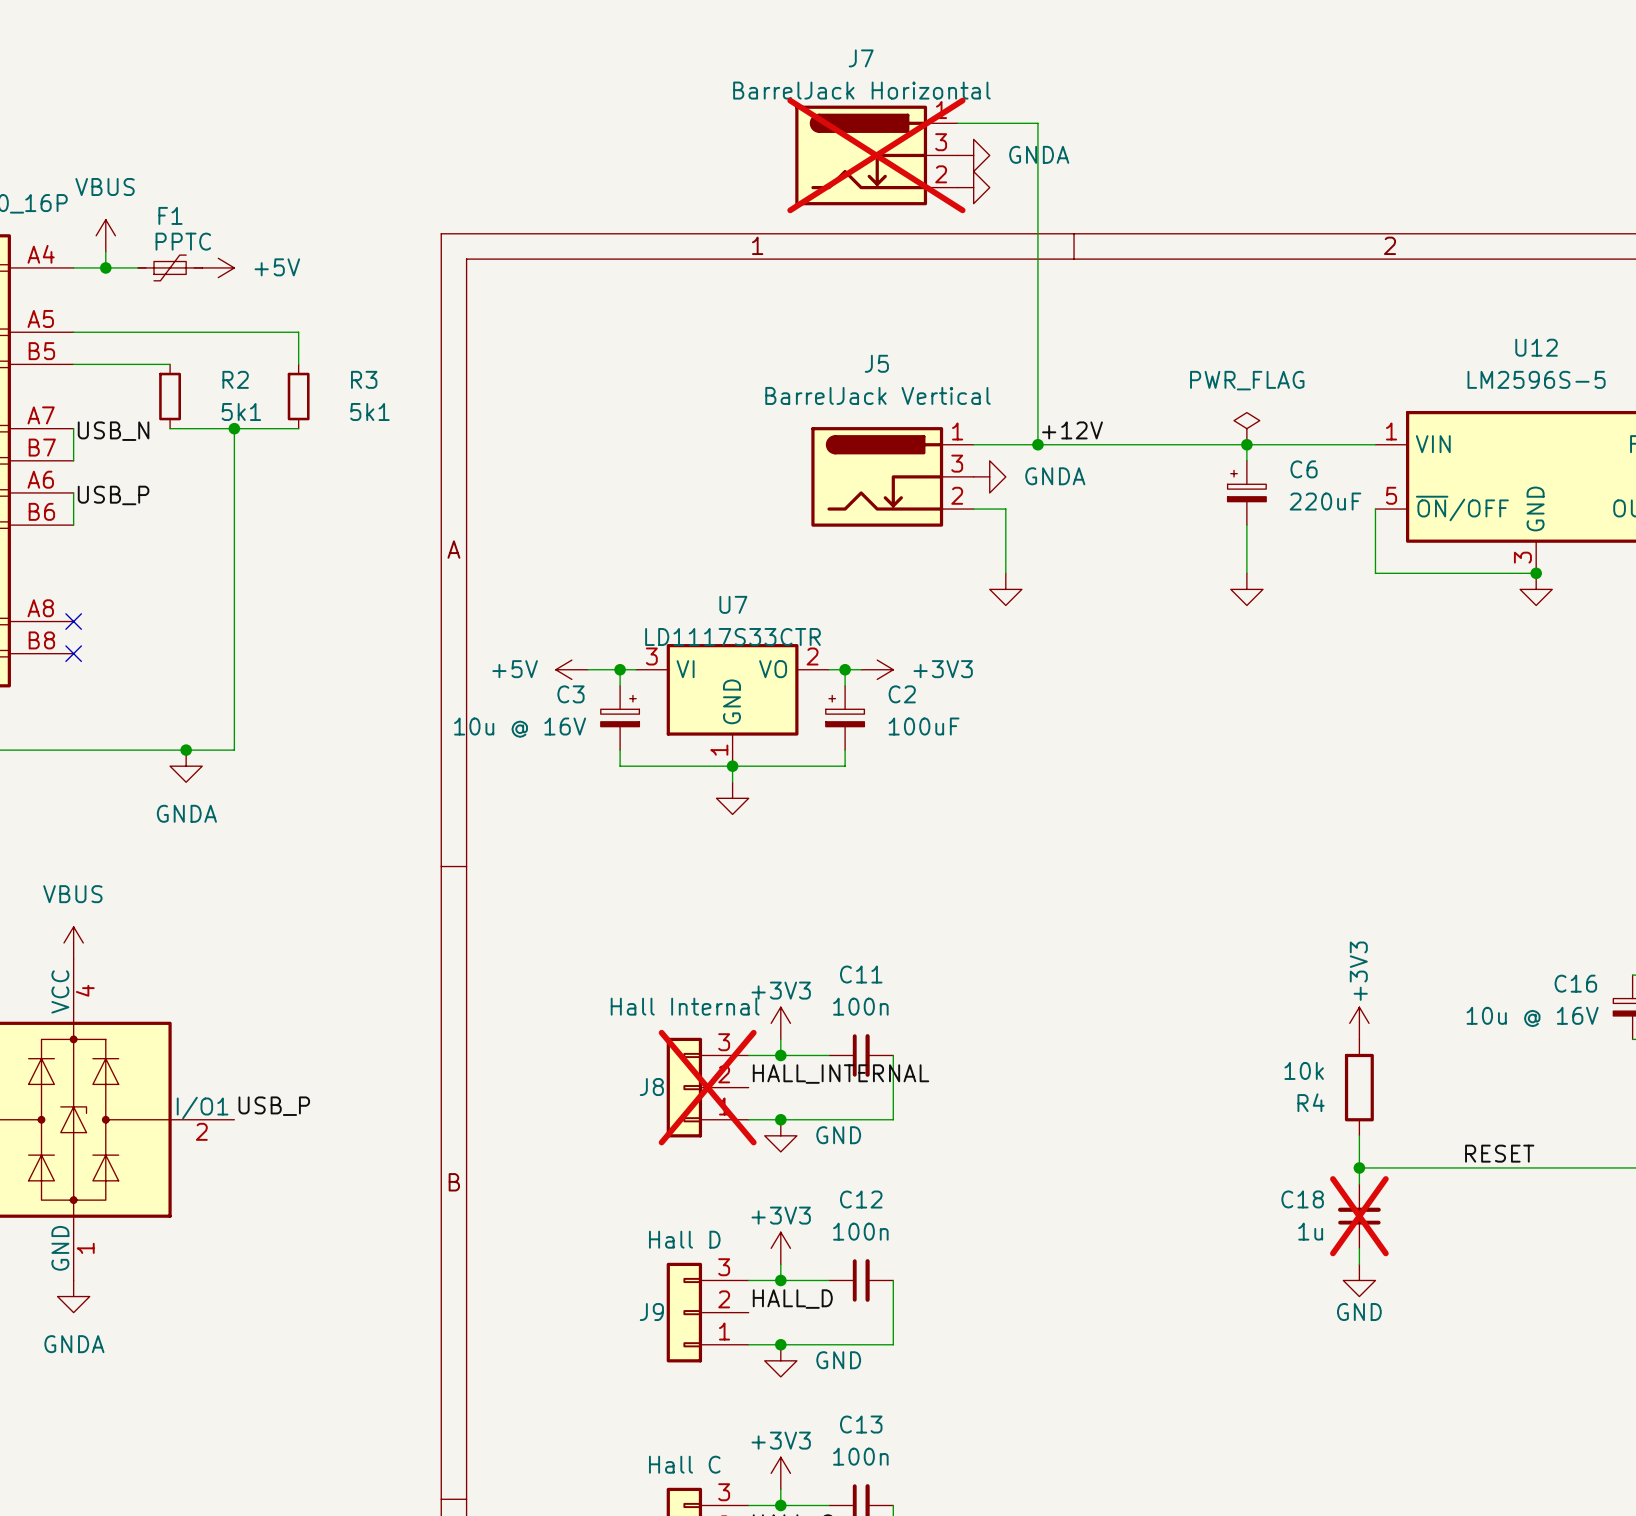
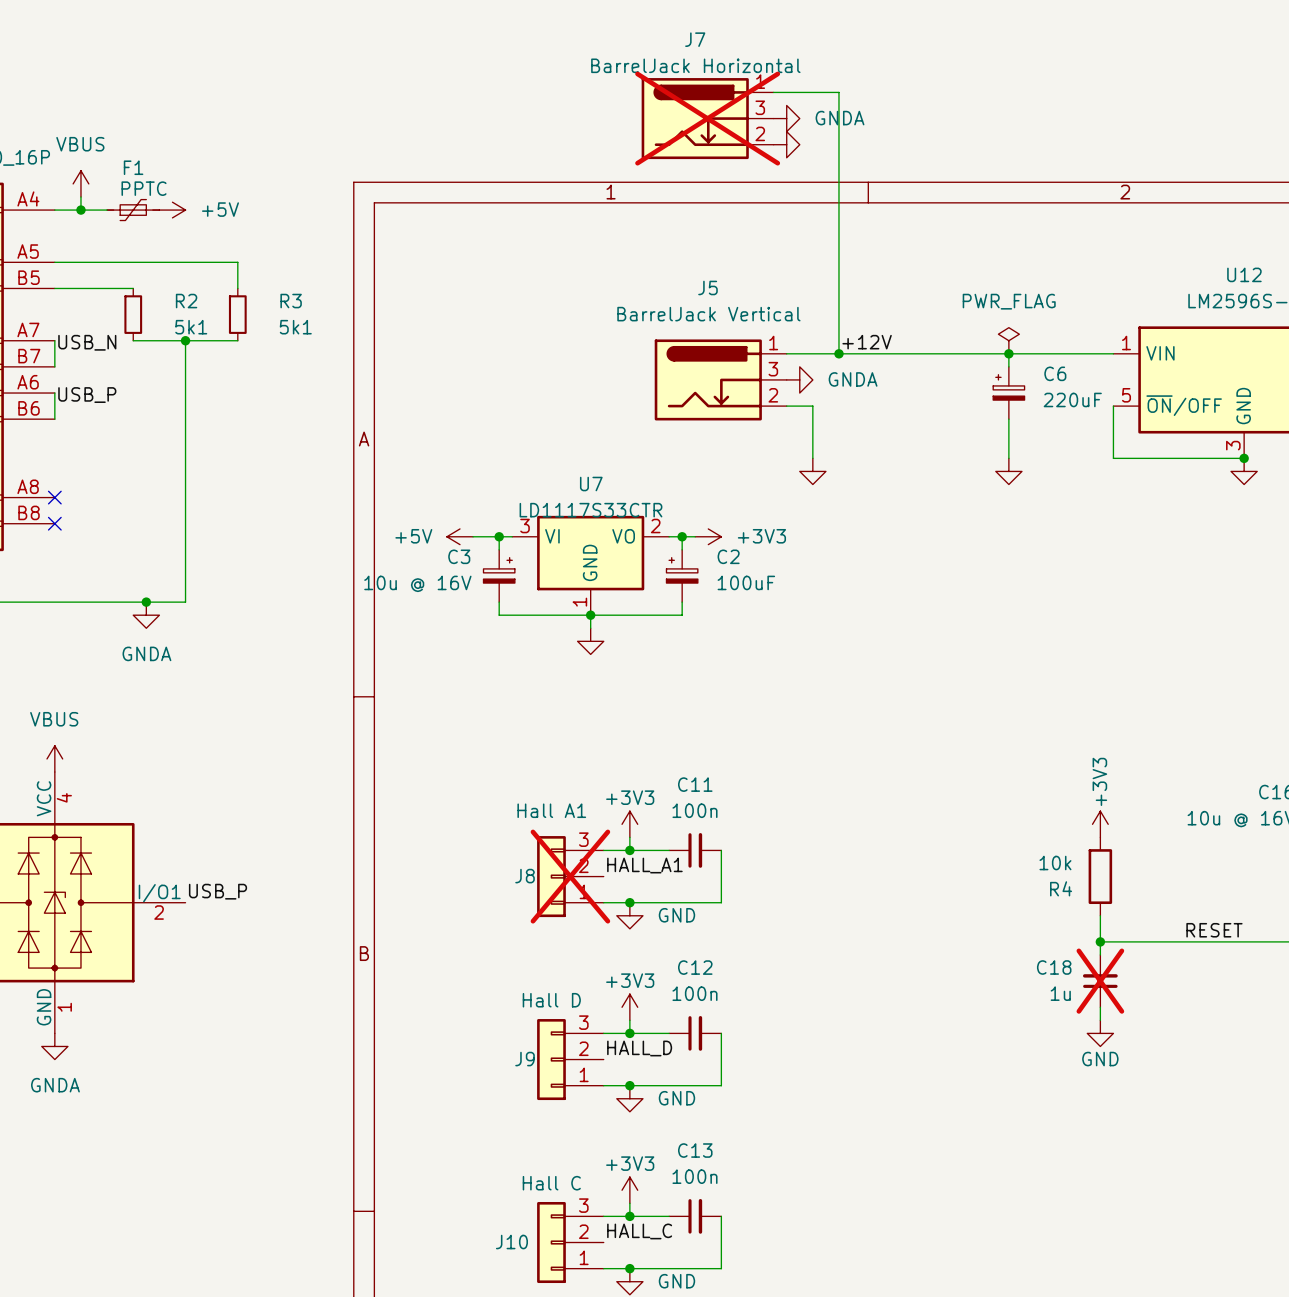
J8 value: Hall Internal (685, 1006) -> Hall A1 (551, 810)
label: HALL_INTERNAL (841, 1074) -> HALL_A1 (644, 865)

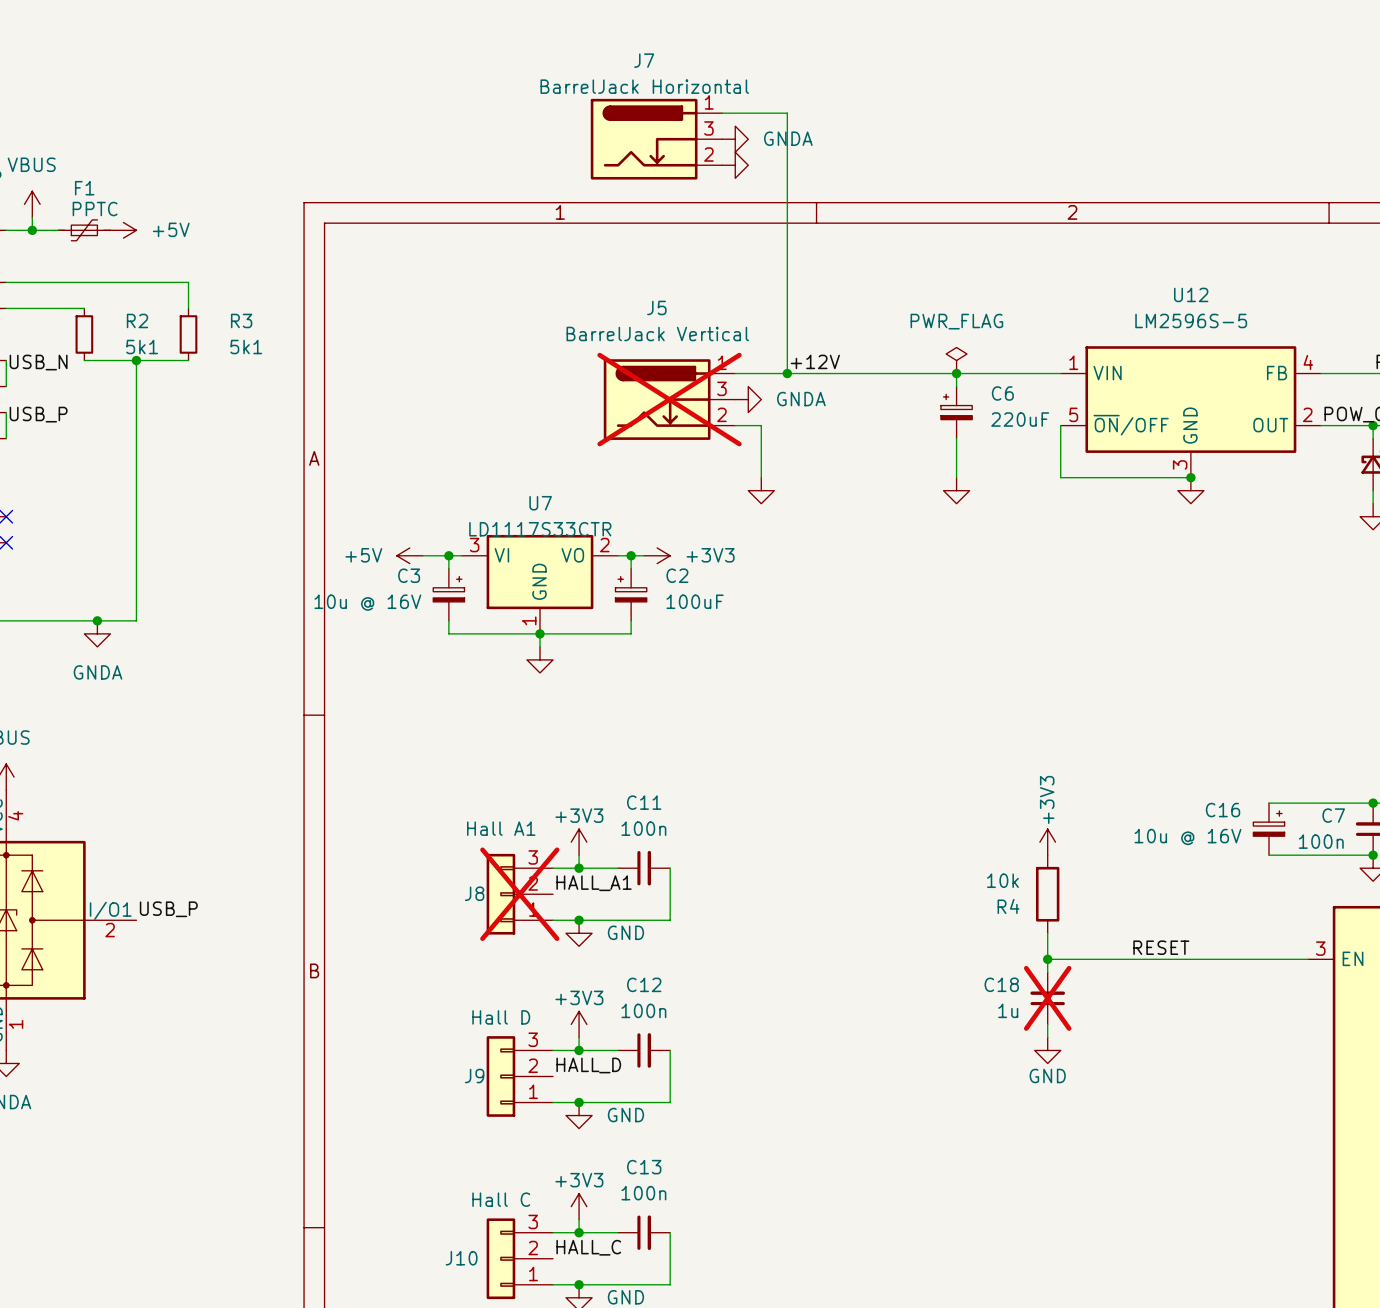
J7 do-not-place cross: (707, 118) -> none
J5 do-not-place cross: none -> (669, 399)

